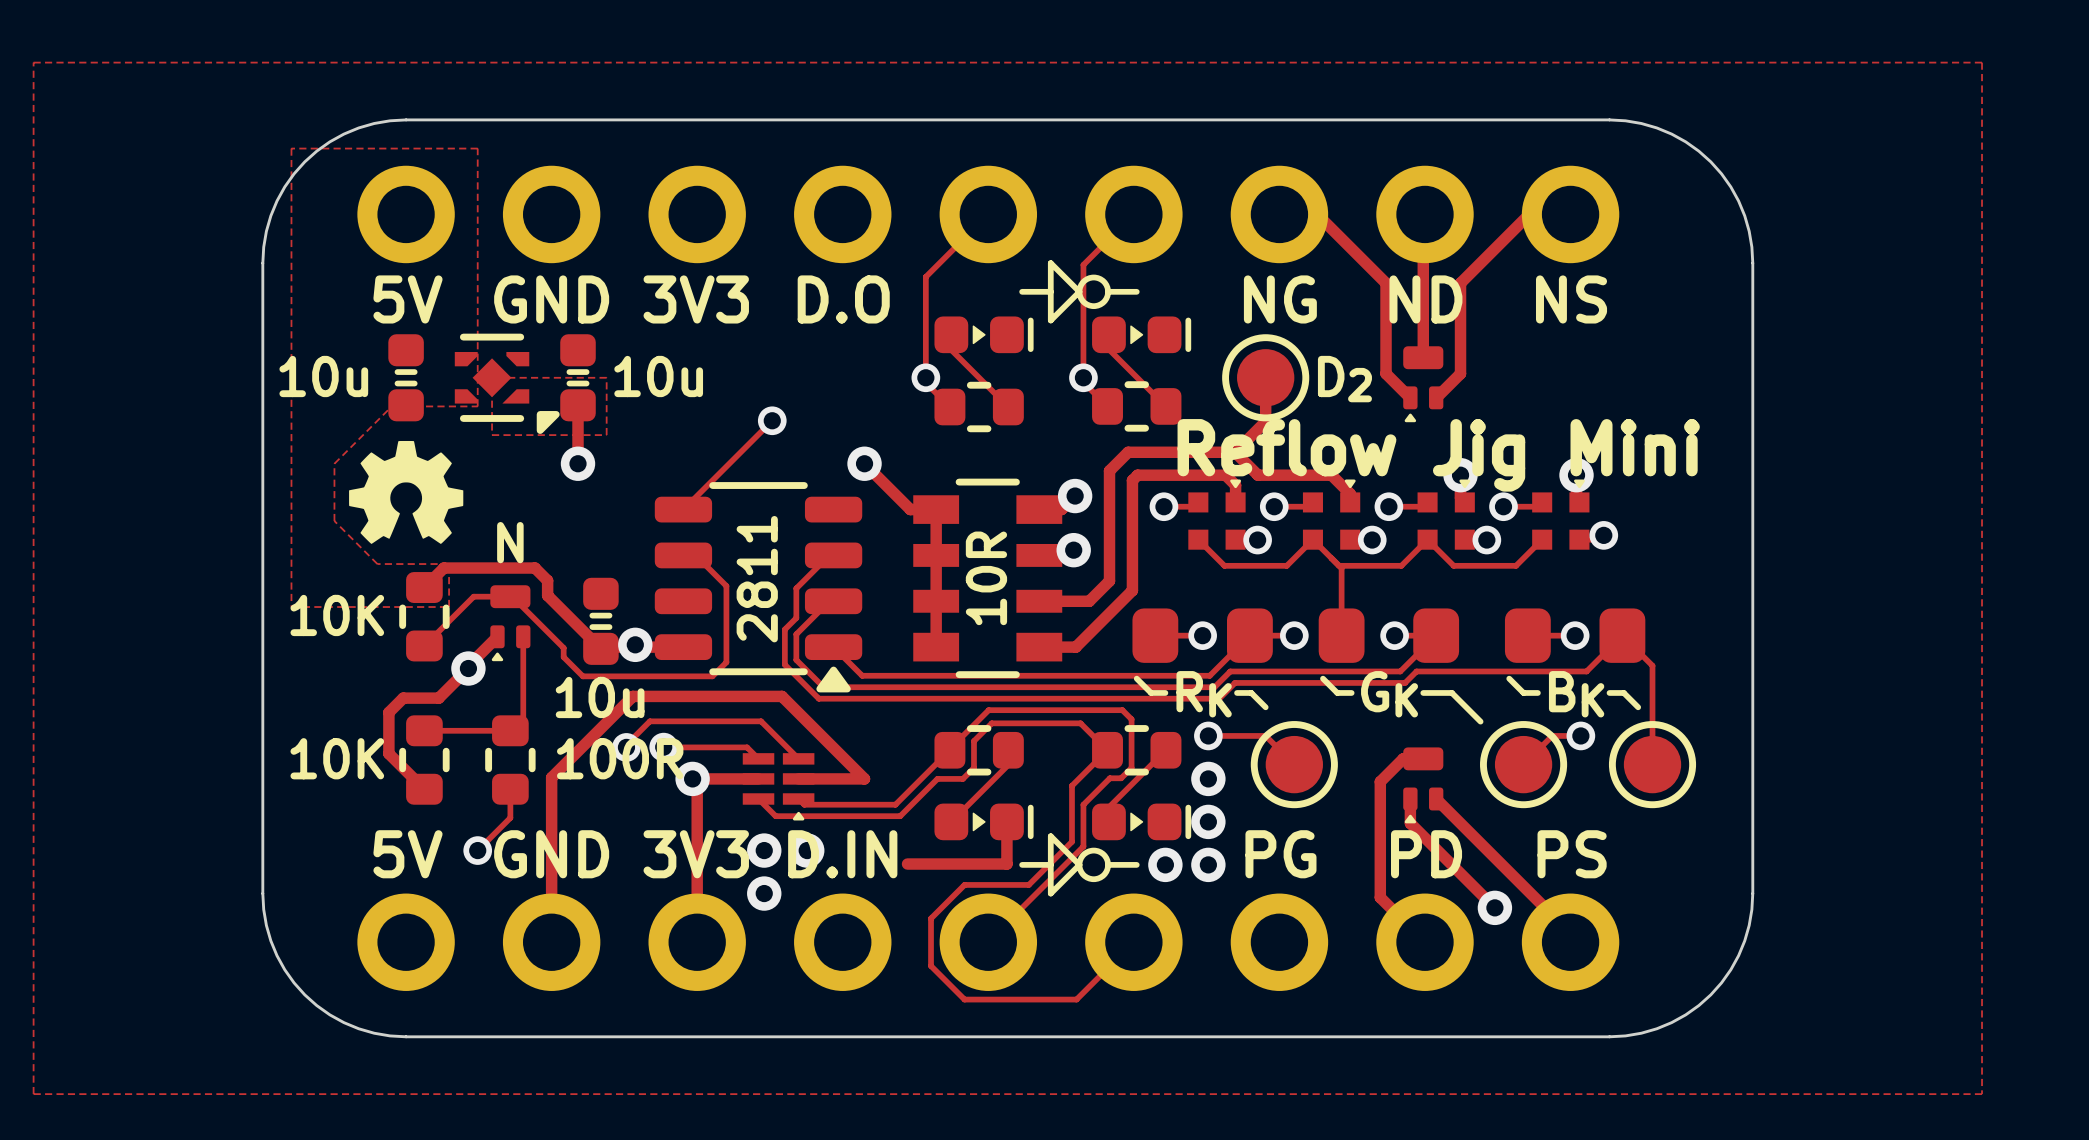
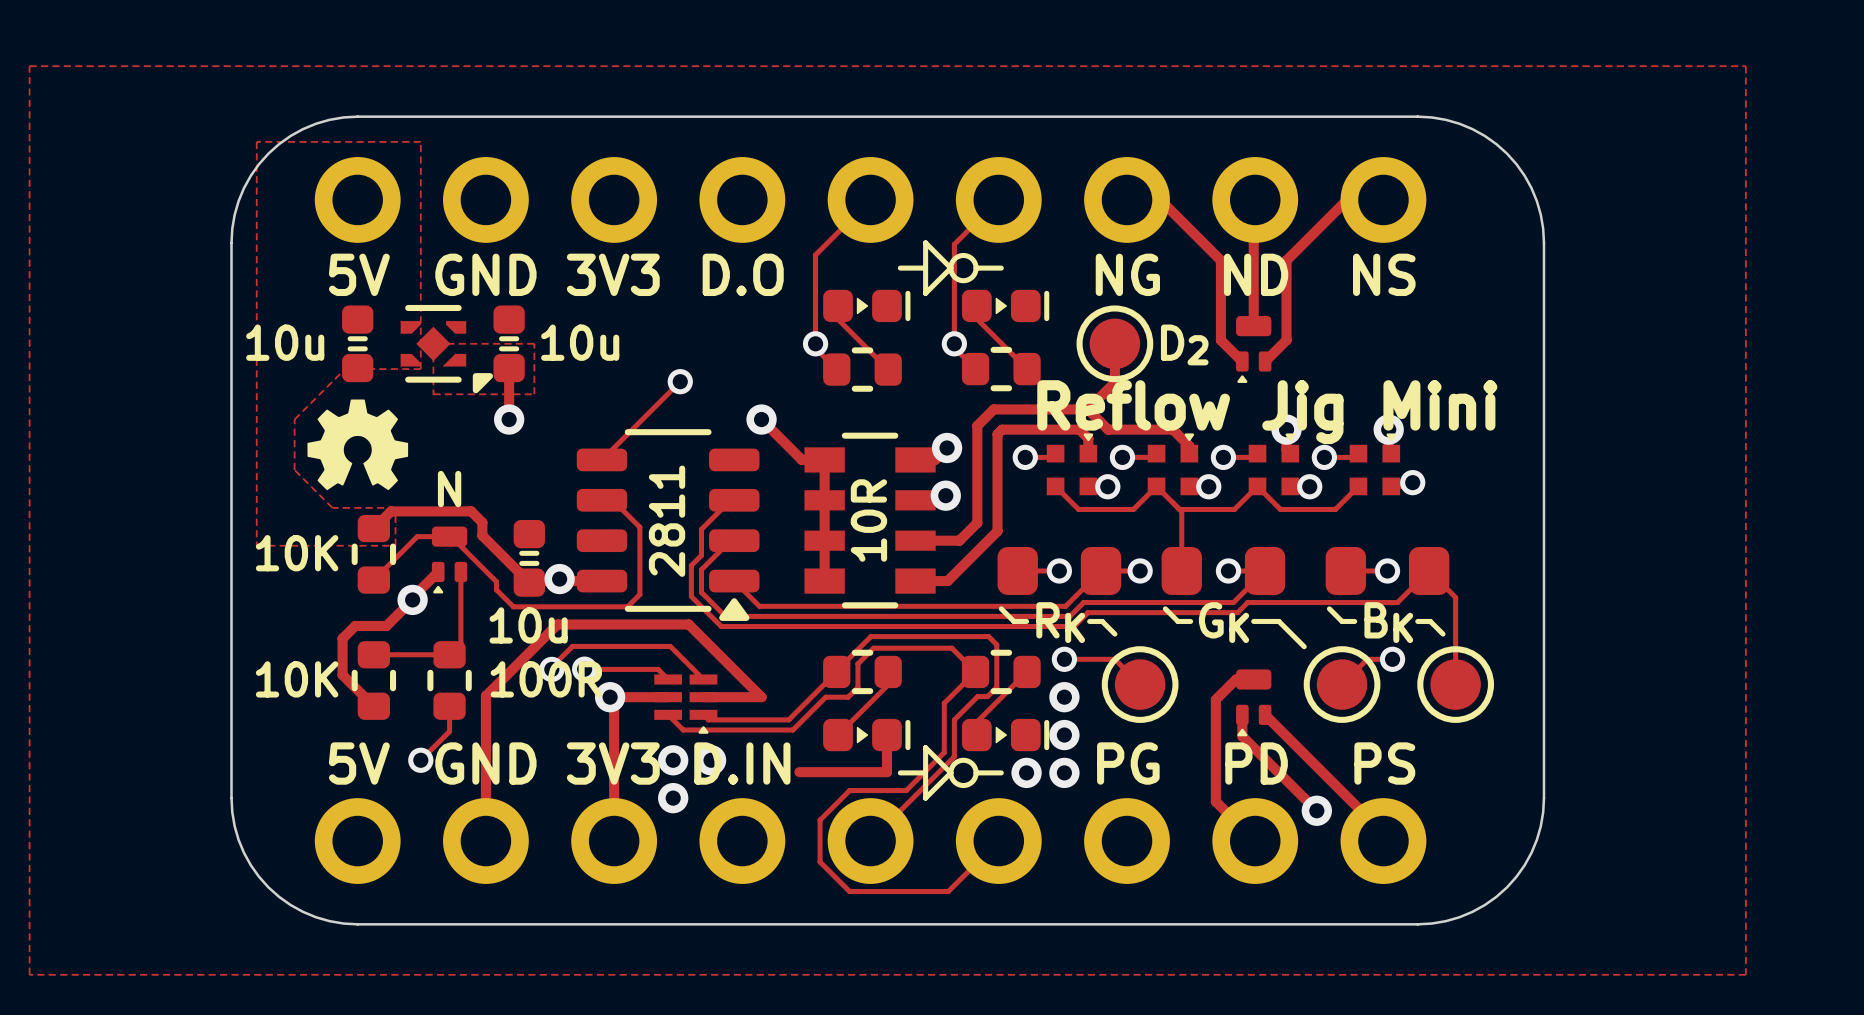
part footprint: [654, 482, 863, 693] -> [576, 429, 760, 621]

